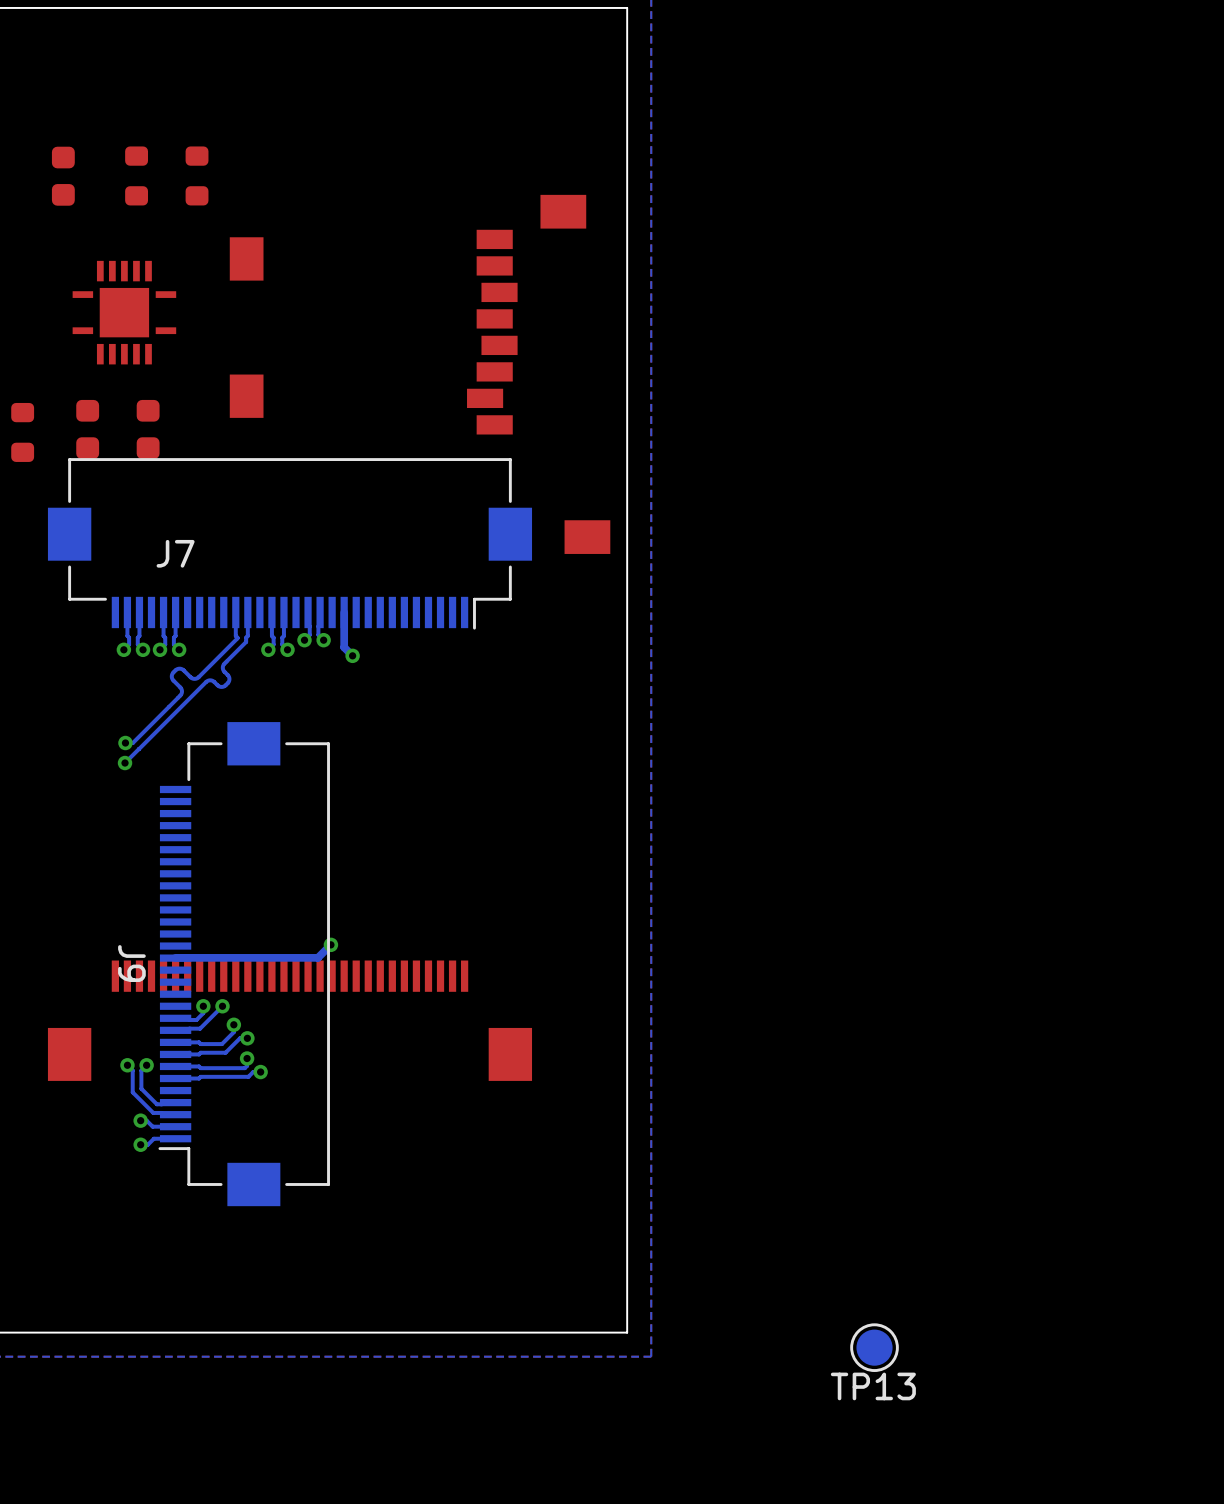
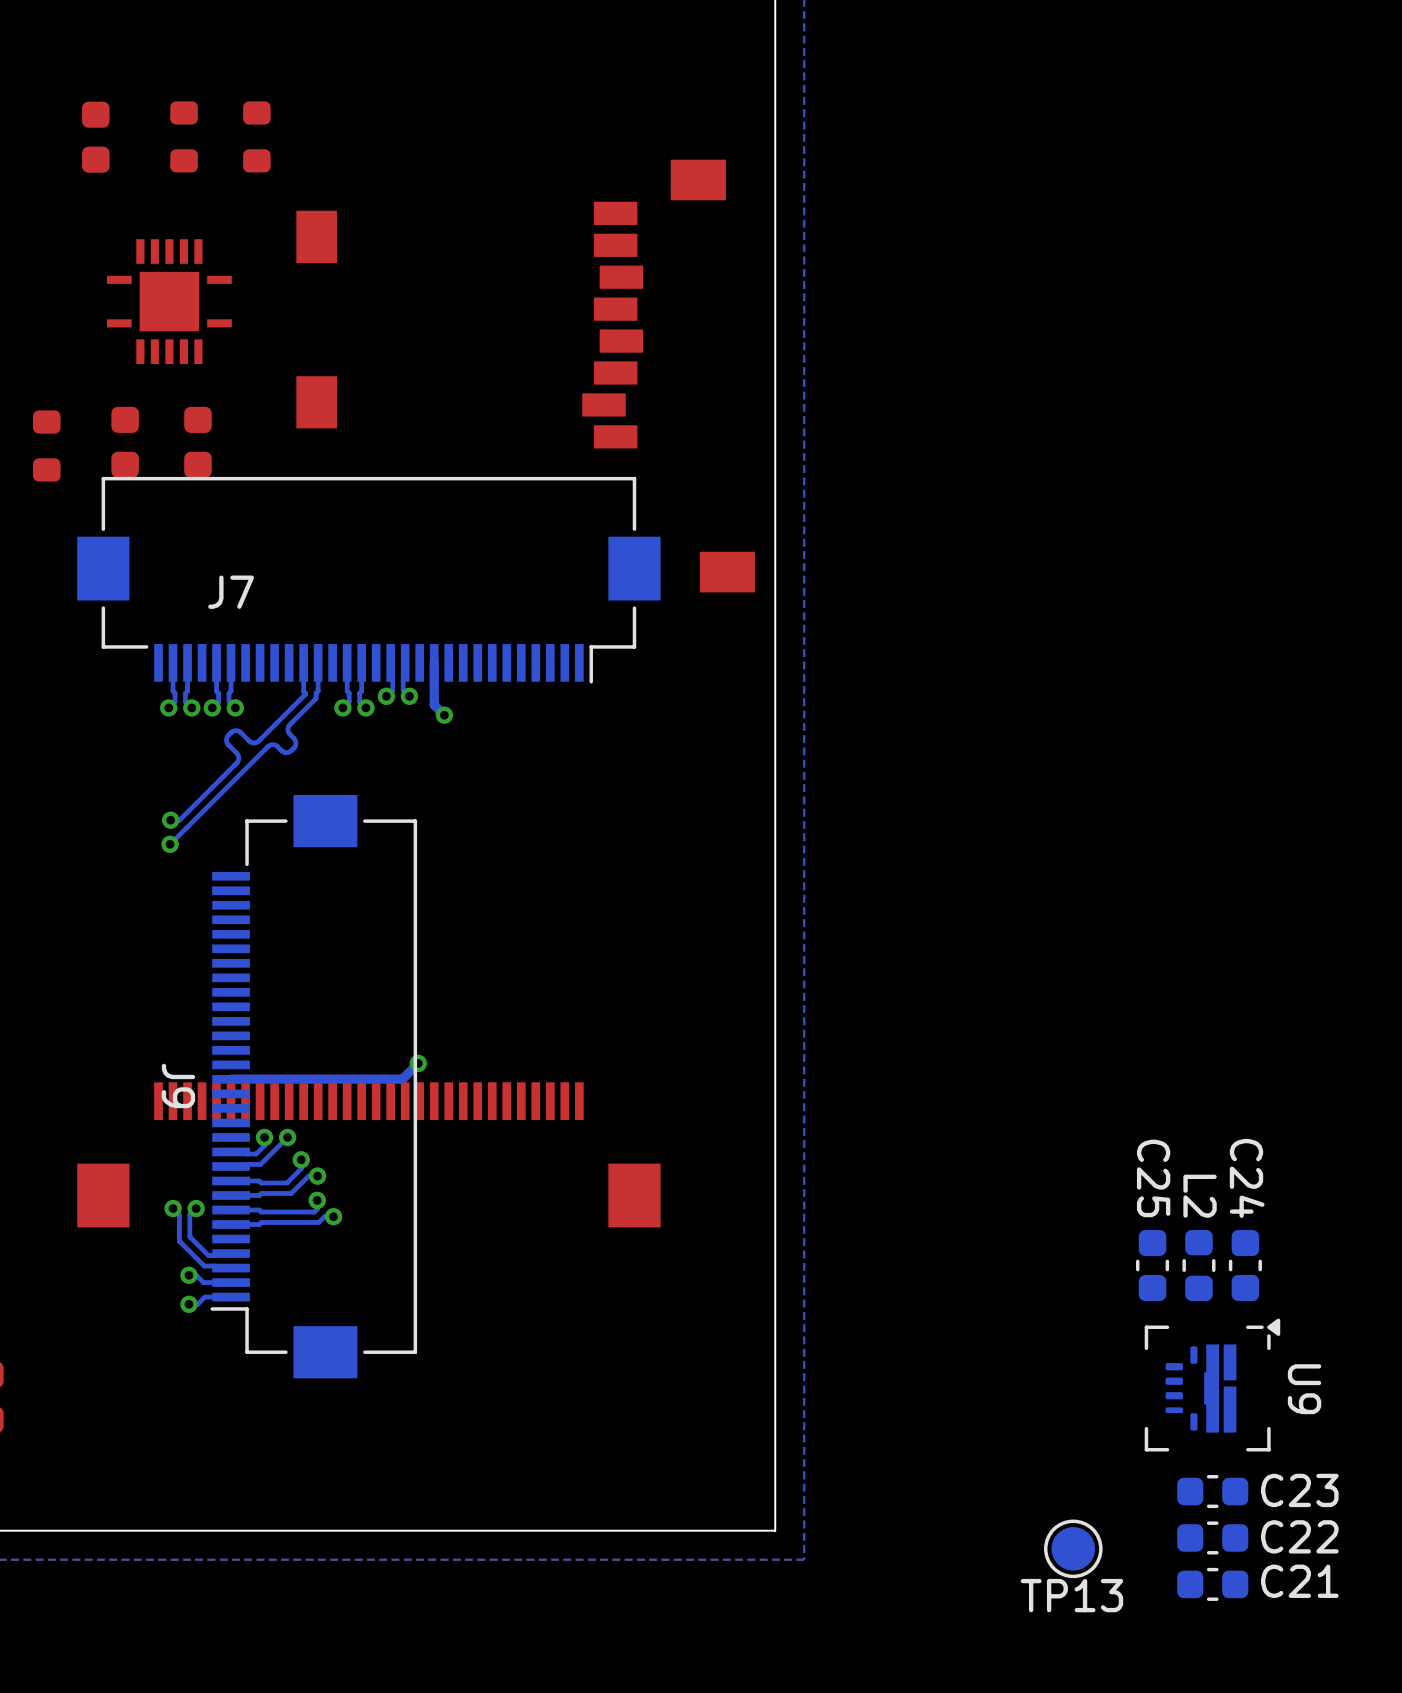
C25: none -> (1152, 1265)
L2: none -> (1198, 1265)
C24: none -> (1245, 1265)
U9: none -> (1212, 1385)
C23: none -> (1212, 1491)
C22: none -> (1212, 1537)
C21: none -> (1212, 1584)

